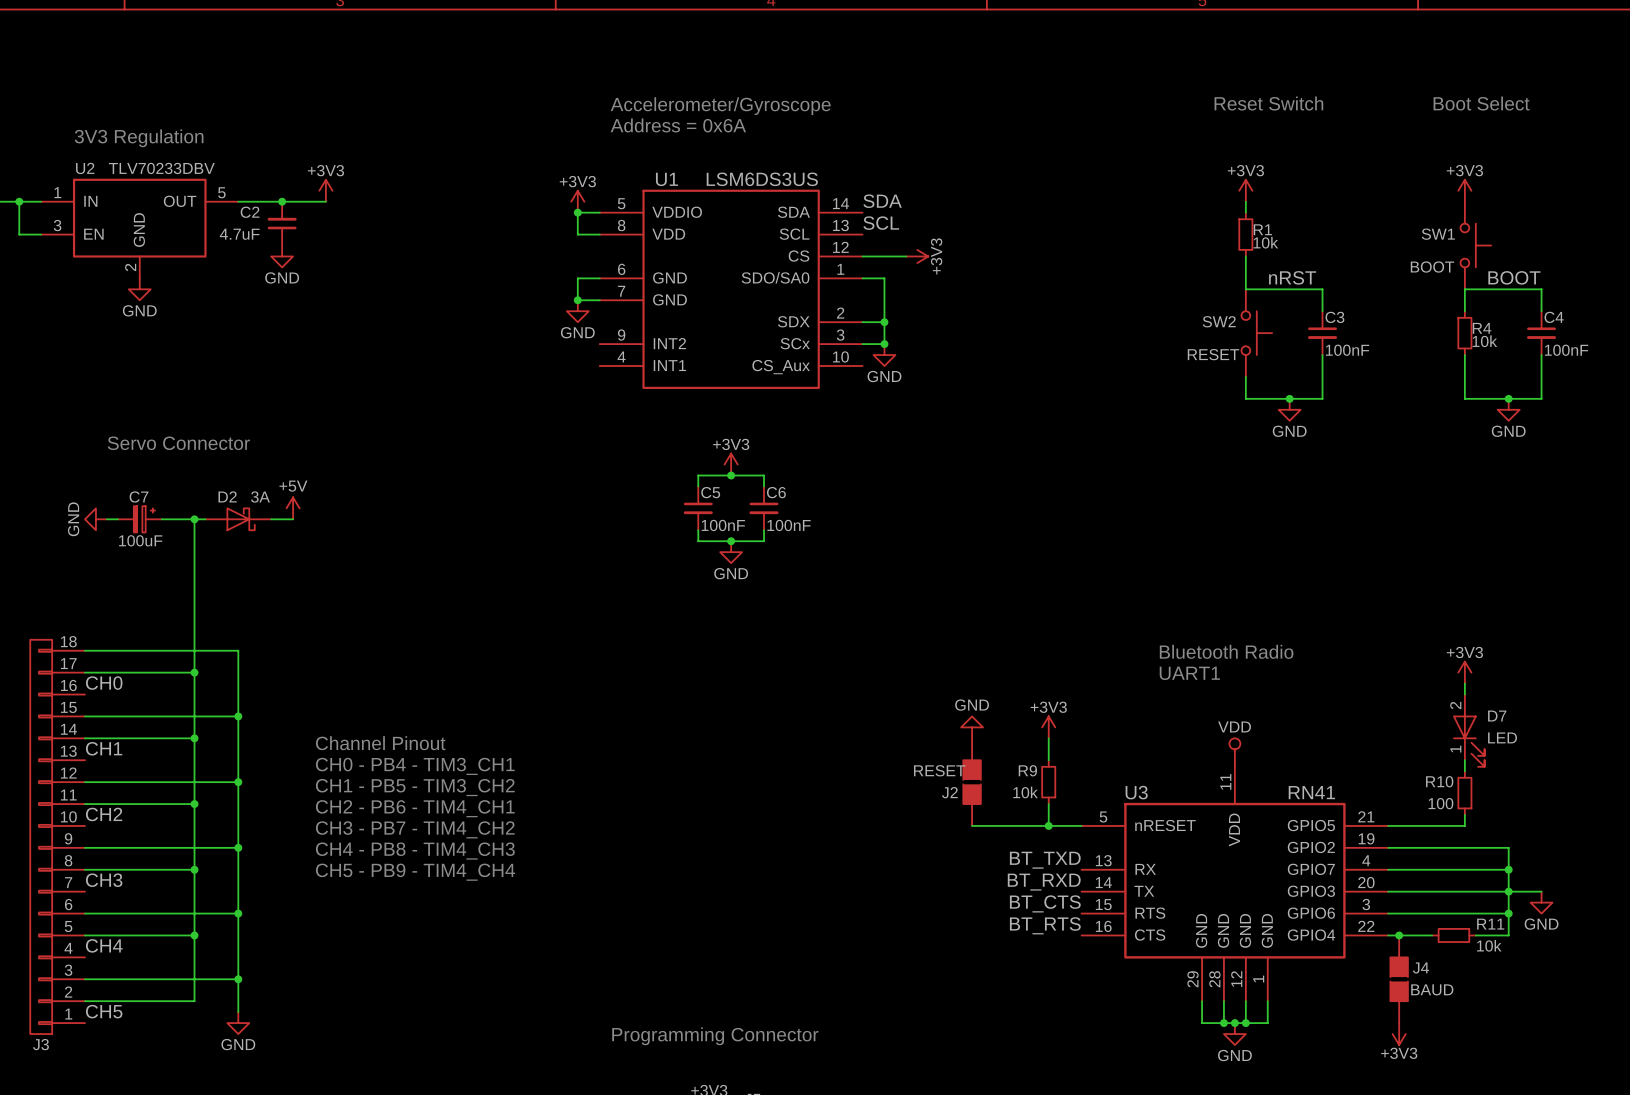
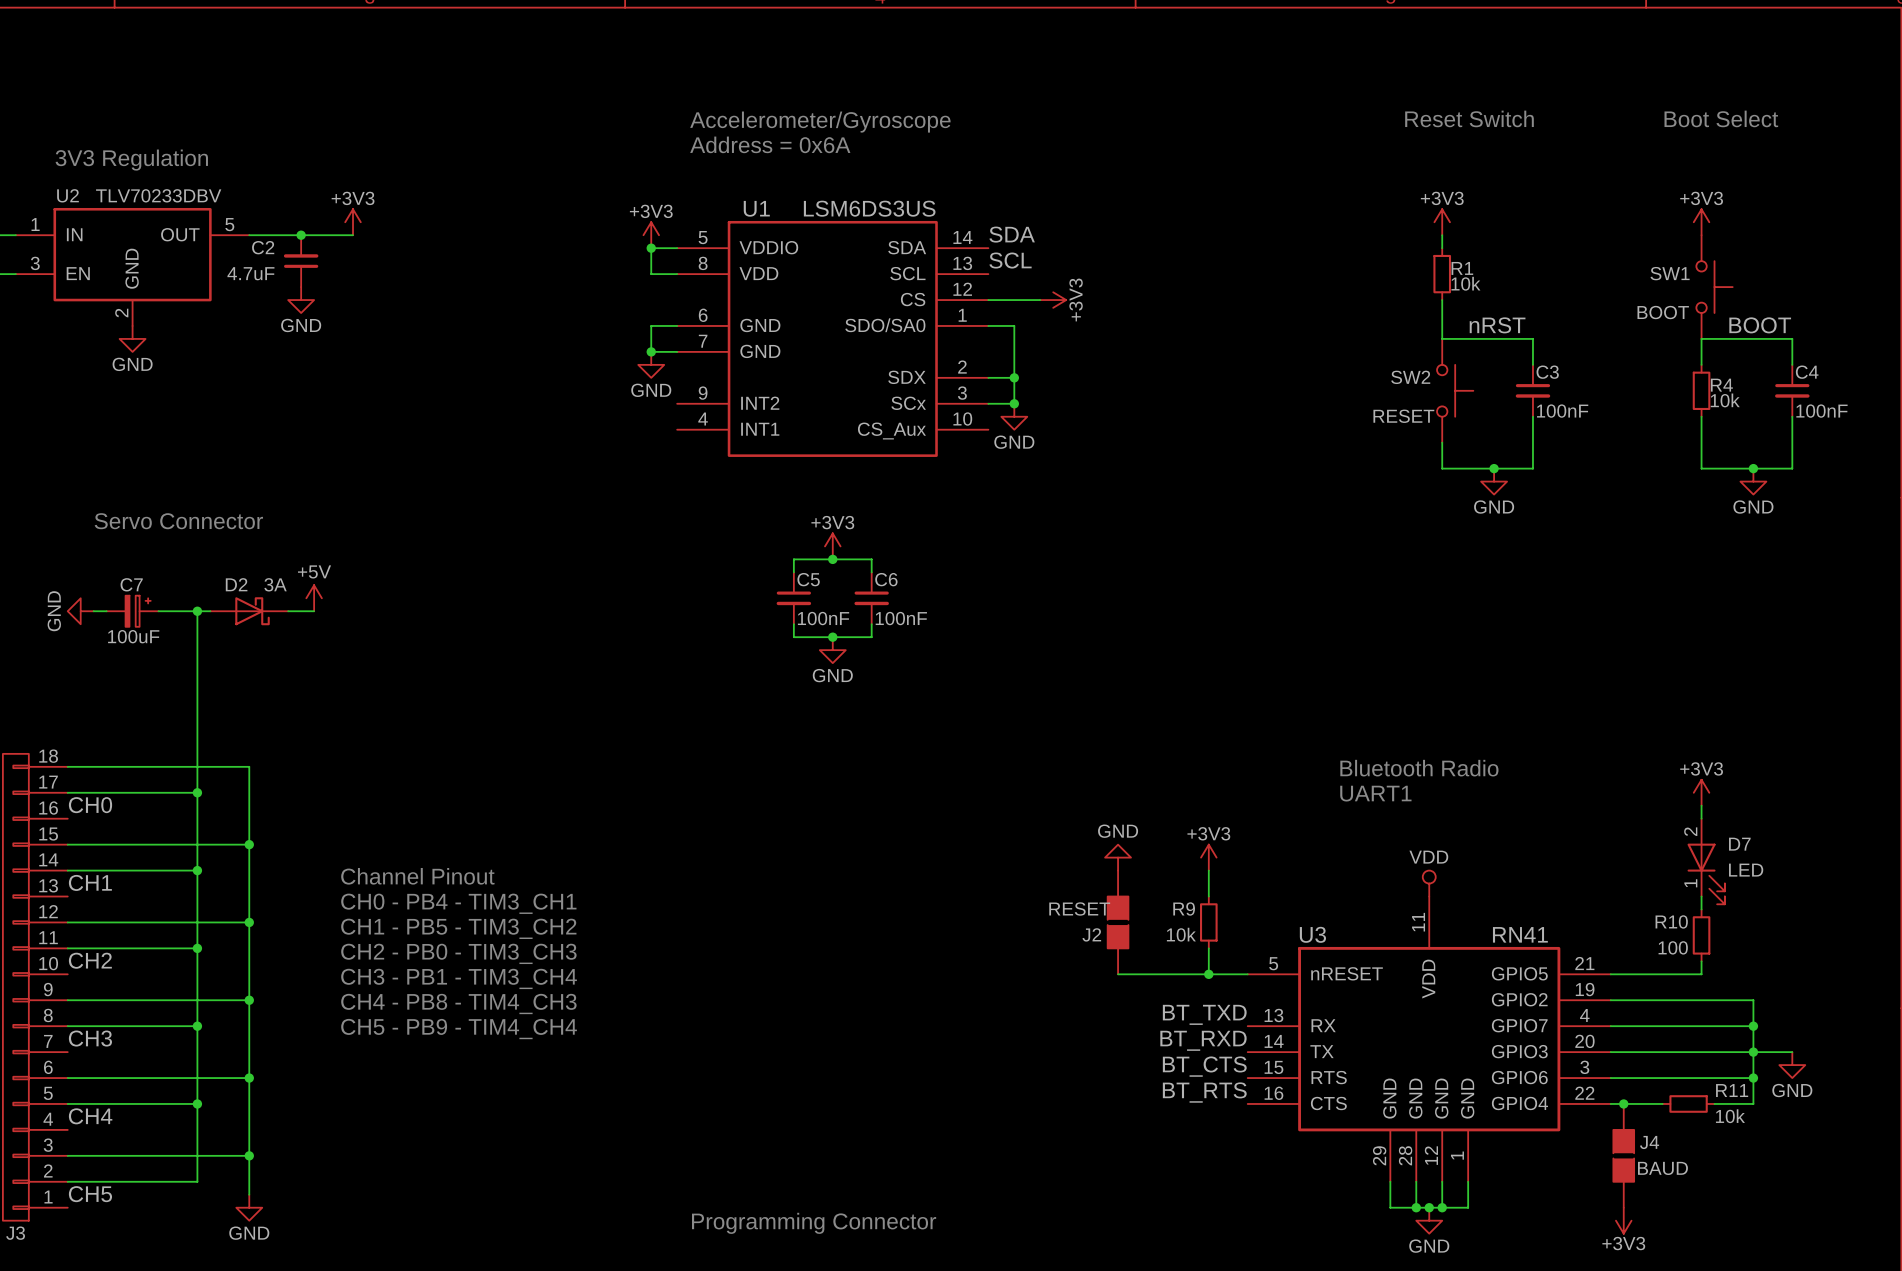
text: CH2 - PB6 - TIM4_CH1 (415, 808) -> CH2 - PB0 - TIM3_CH3 (458, 953)
text: CH3 - PB7 - TIM4_CH2 (415, 829) -> CH3 - PB1 - TIM3_CH4 (459, 978)

